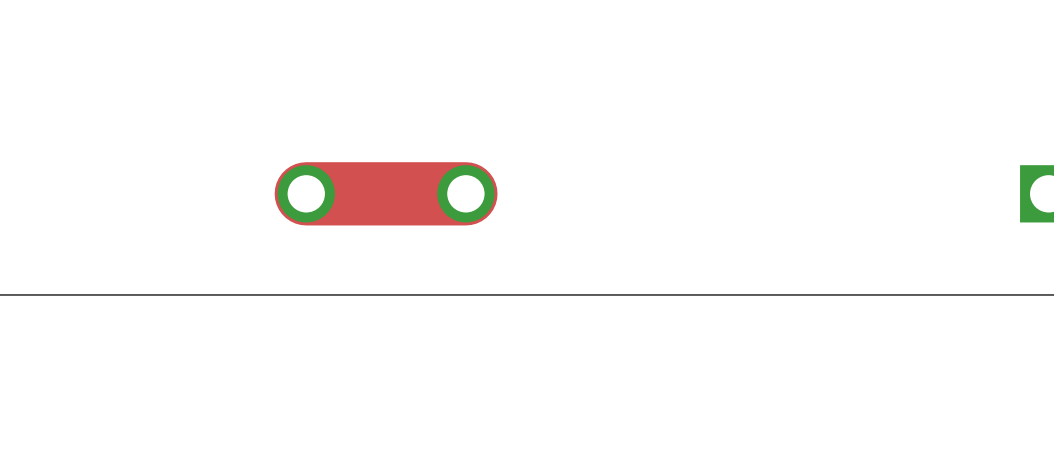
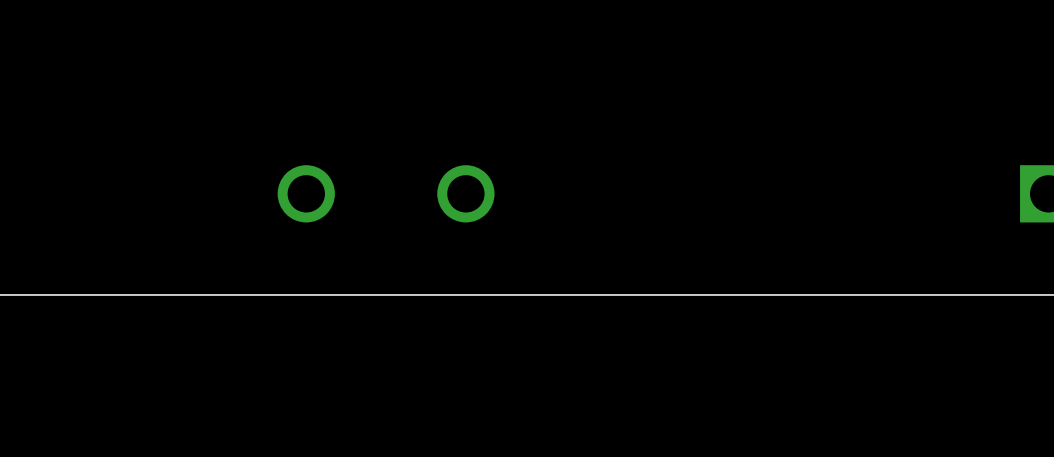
top track: (465, 193) (306, 193) -> none

